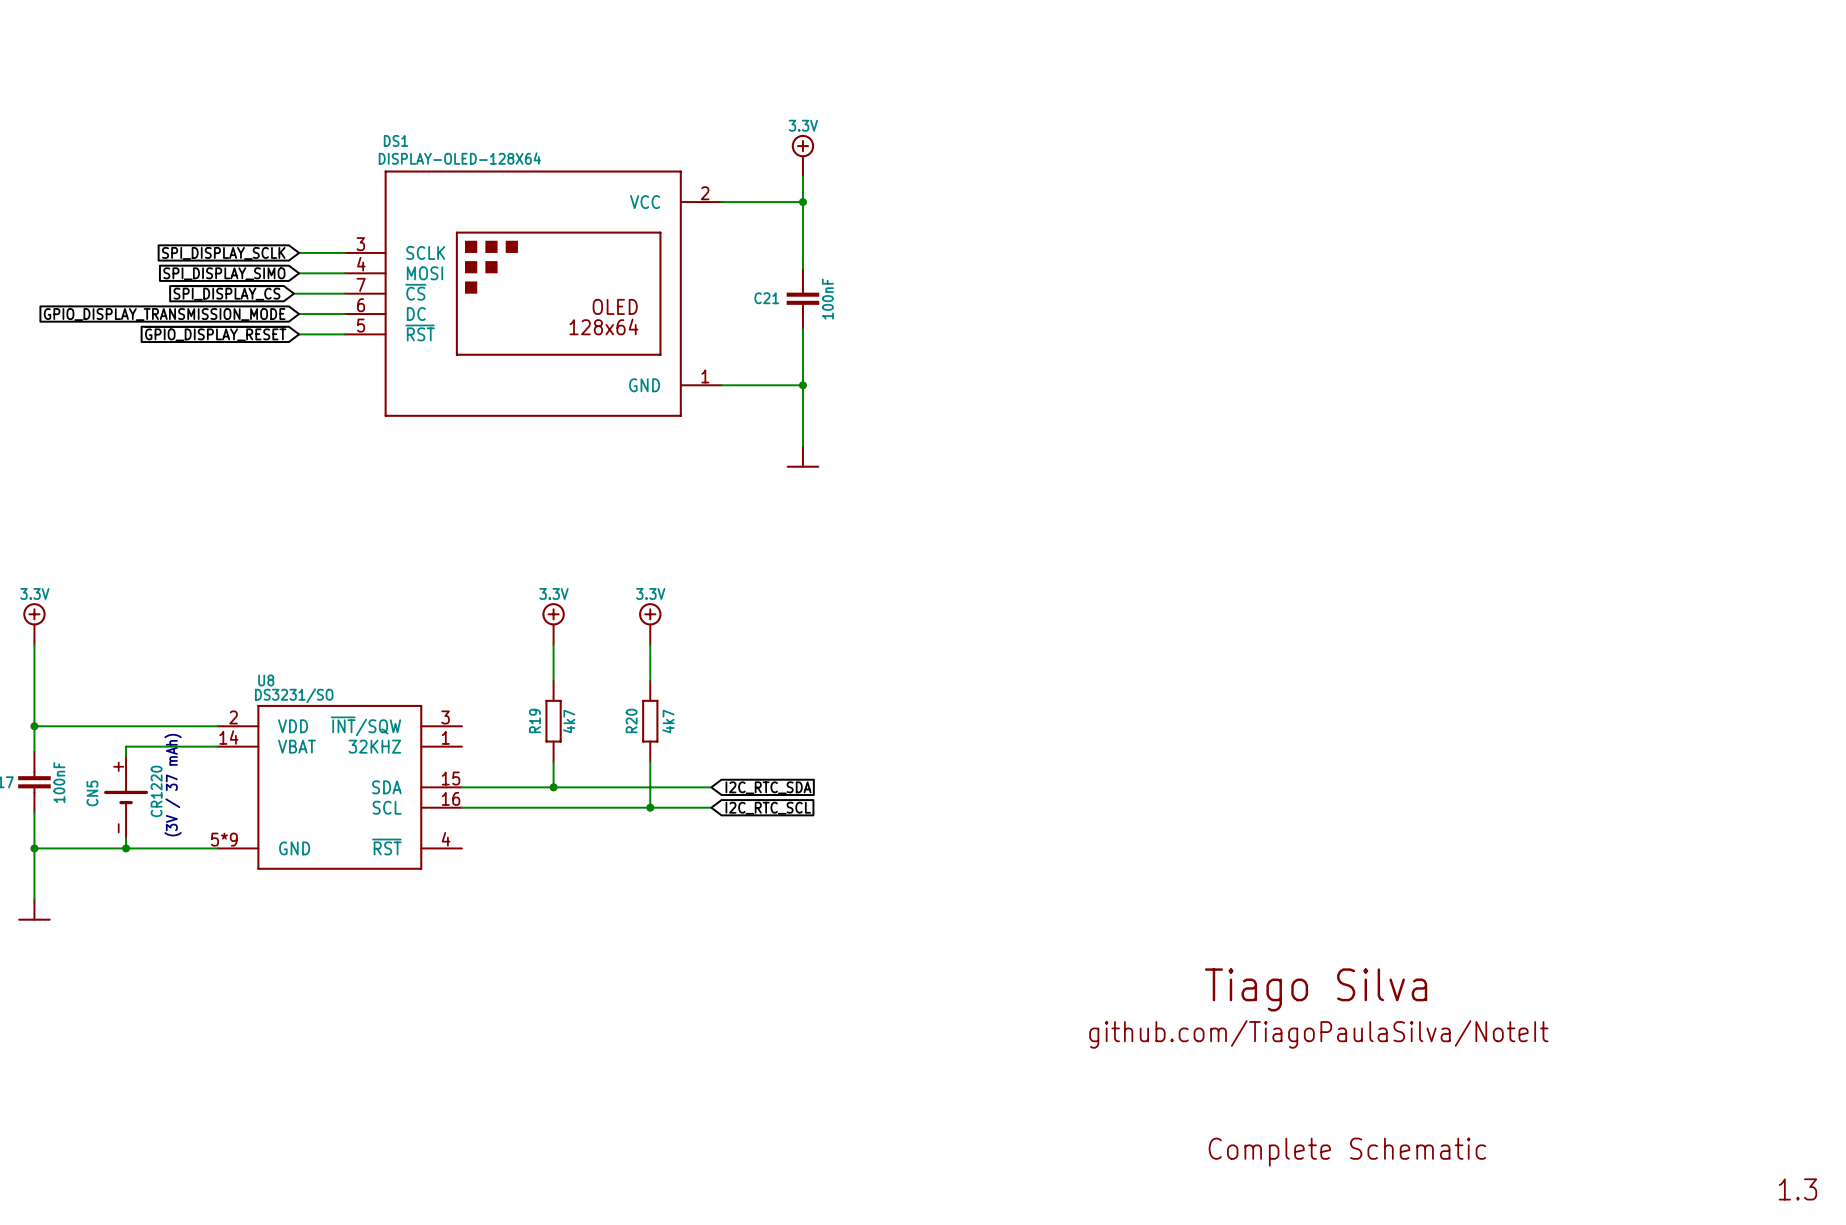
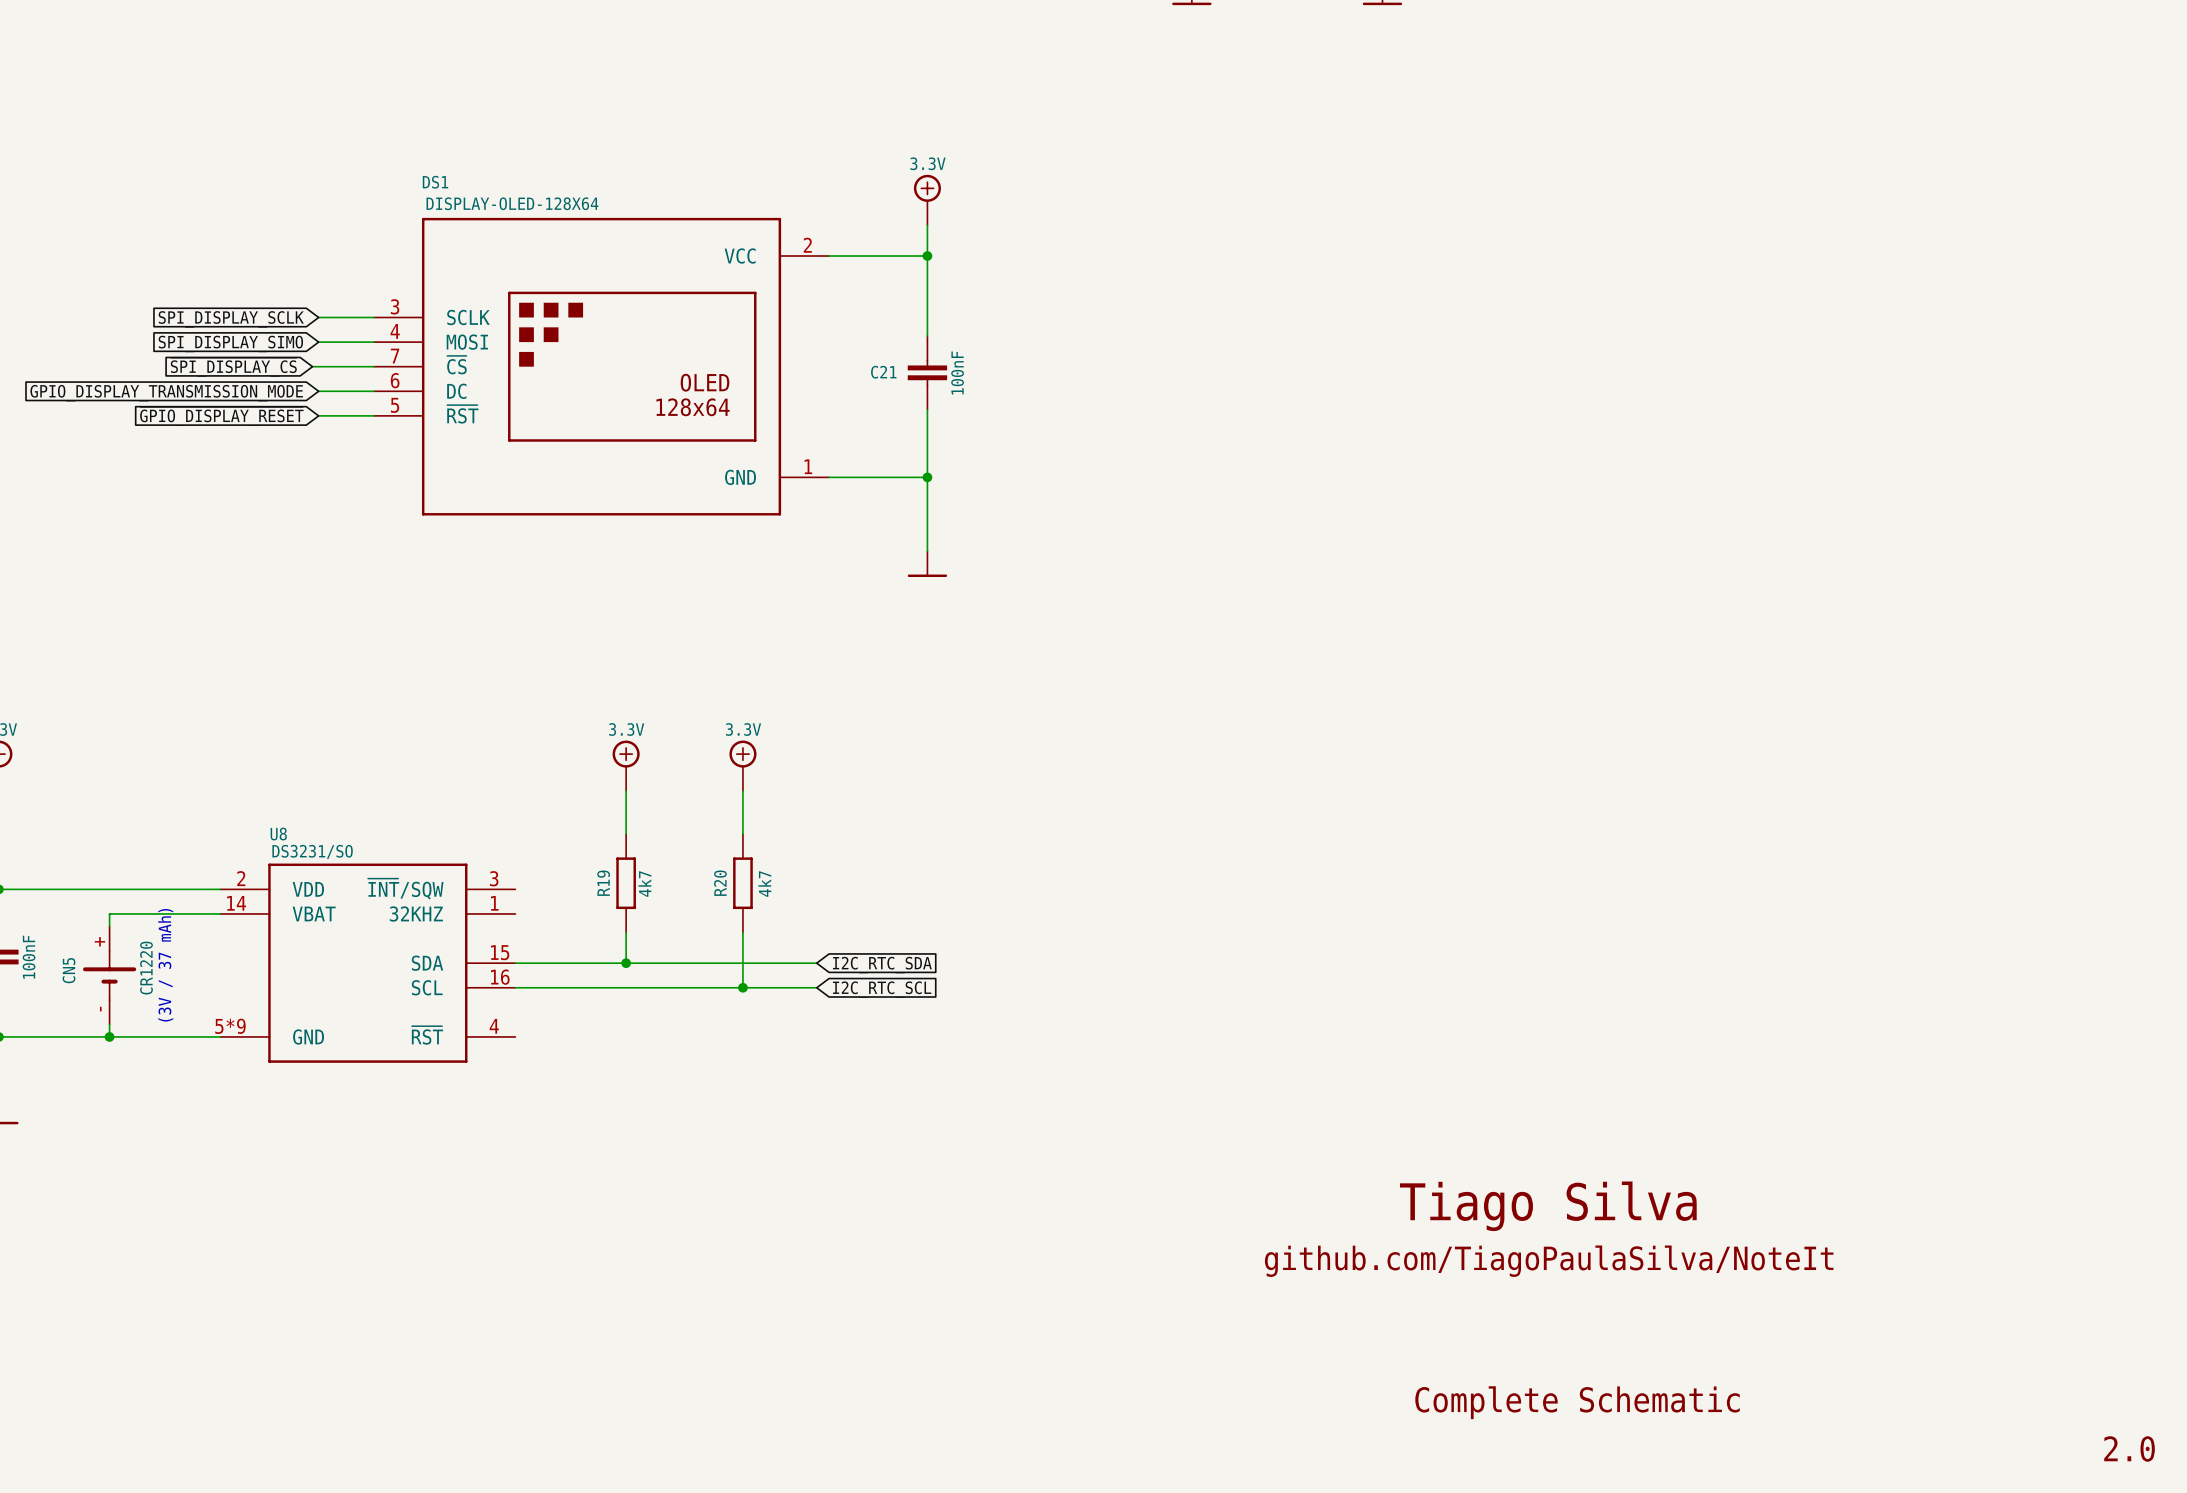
text: 1.3 (1797, 1189) -> 2.0 (2129, 1448)

